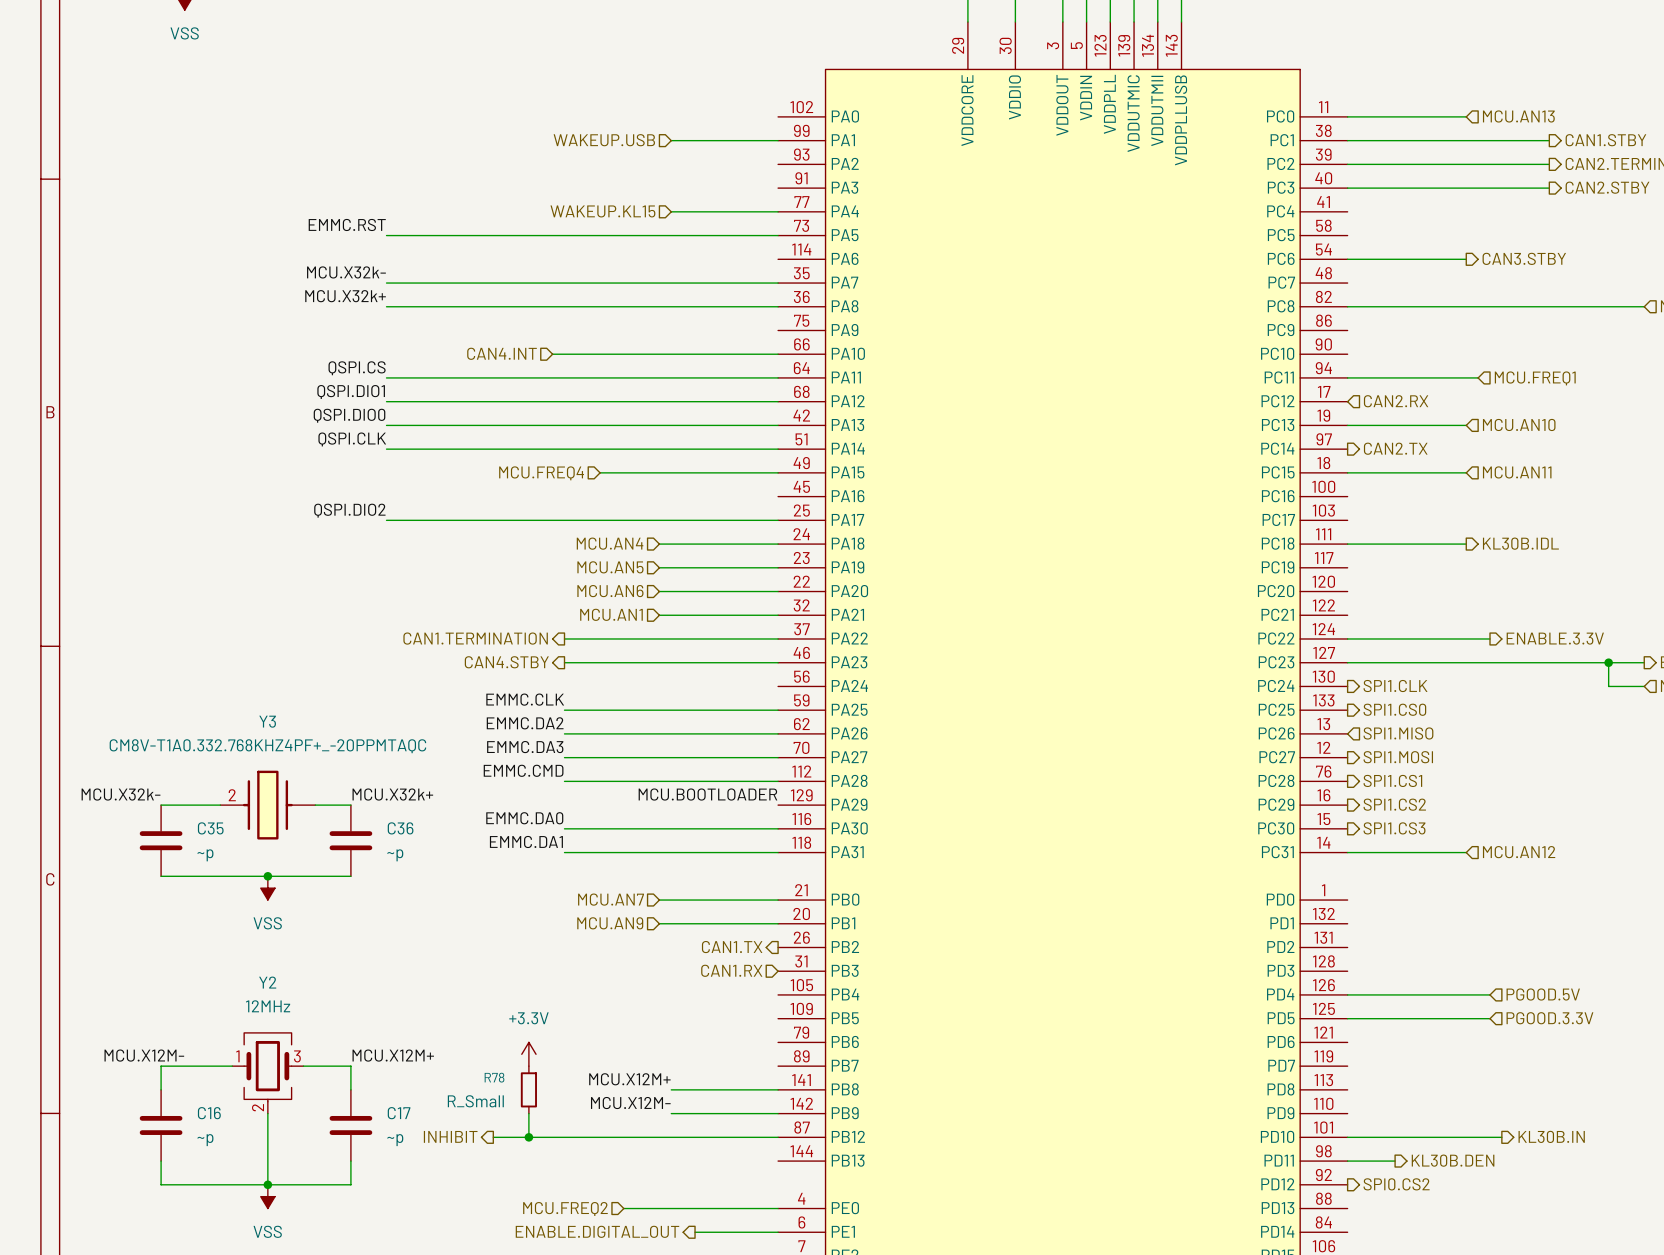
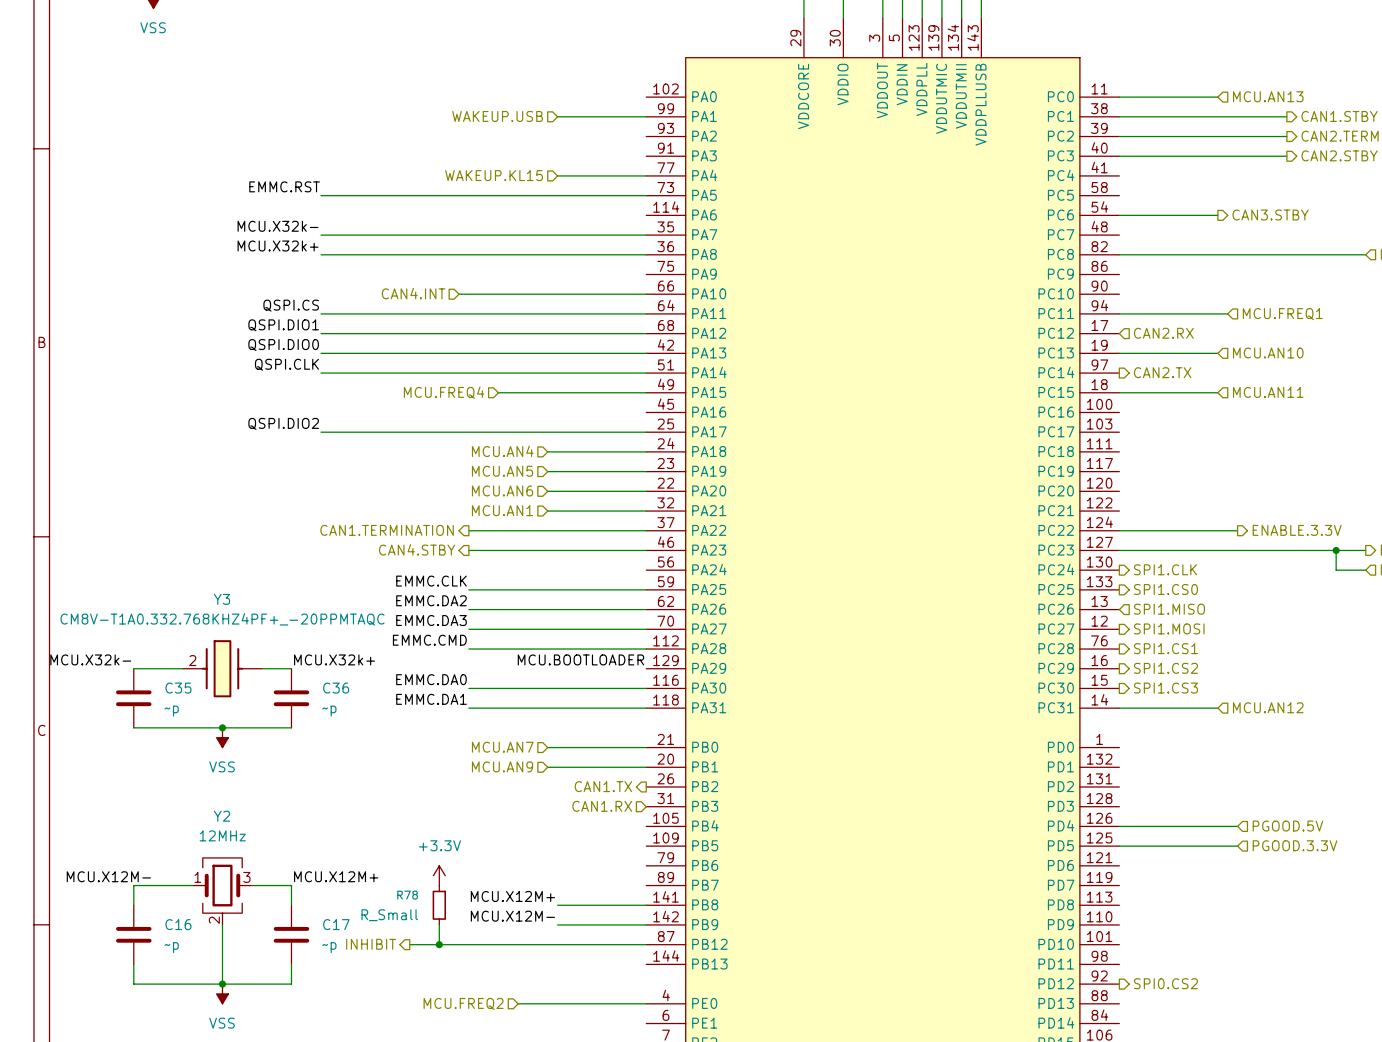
hierarchical label: KL30B.IDL (1520, 543) -> none
wire: (1347, 544) (1466, 544) -> none
hierarchical label: KL30B.IN (1551, 1136) -> none
wire: (1347, 1137) (1501, 1137) -> none
hierarchical label: KL30B.DEN (1453, 1160) -> none
wire: (1347, 1161) (1395, 1161) -> none
hierarchical label: ENABLE.DIGITAL_OUT (597, 1231) -> none
wire: (695, 1232) (778, 1232) -> none

